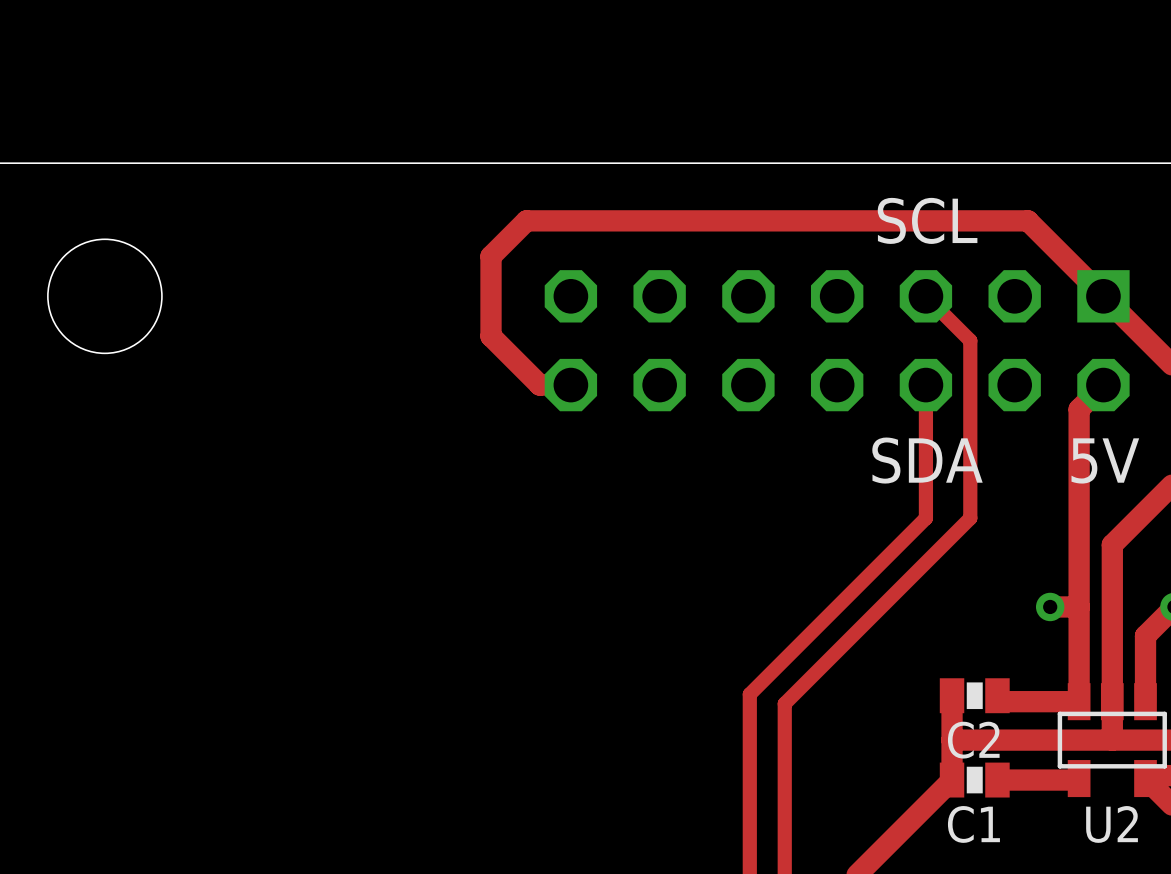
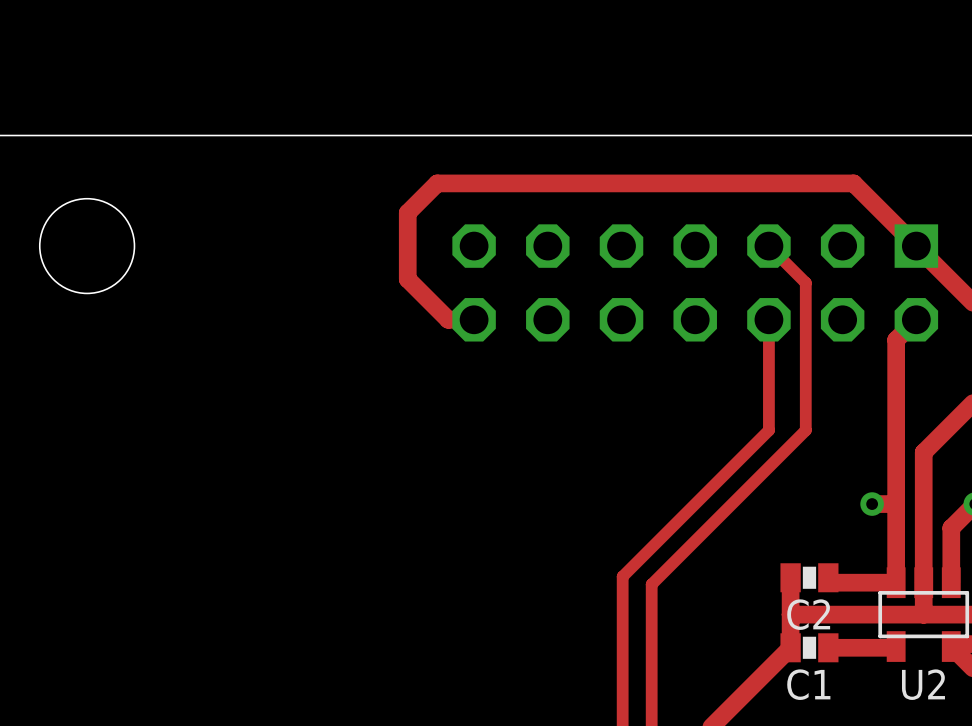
text: SCL (927, 220) -> none
text: SDA (927, 460) -> none
text: 5V (1105, 460) -> none

